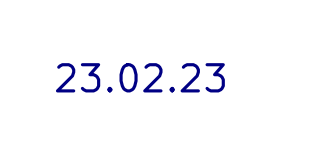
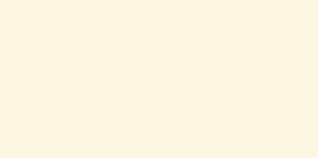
text: 23.02.23 (140, 77) -> none

